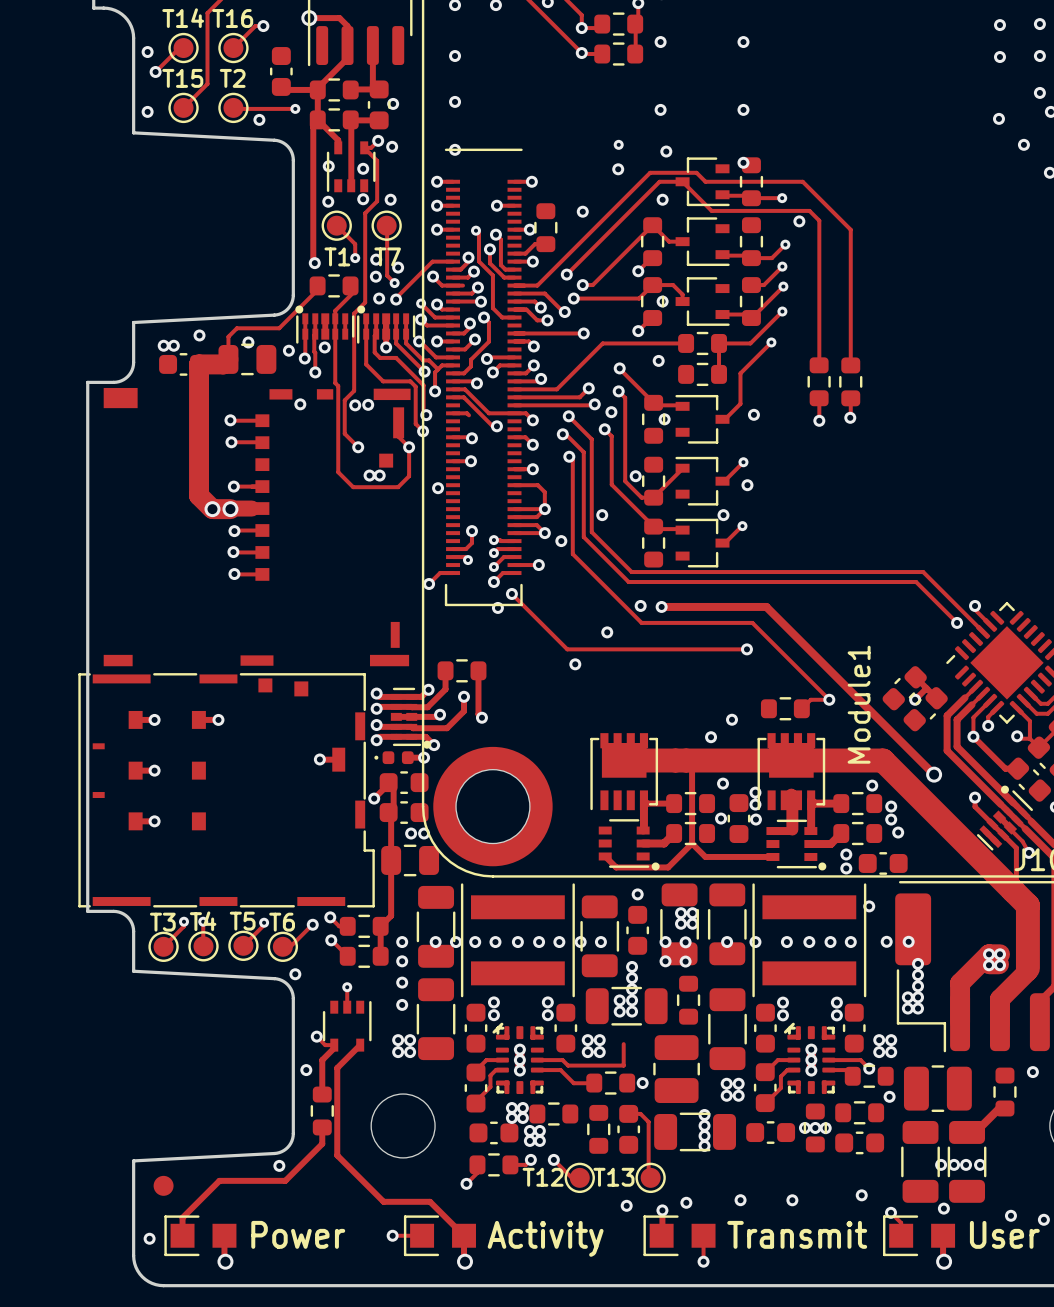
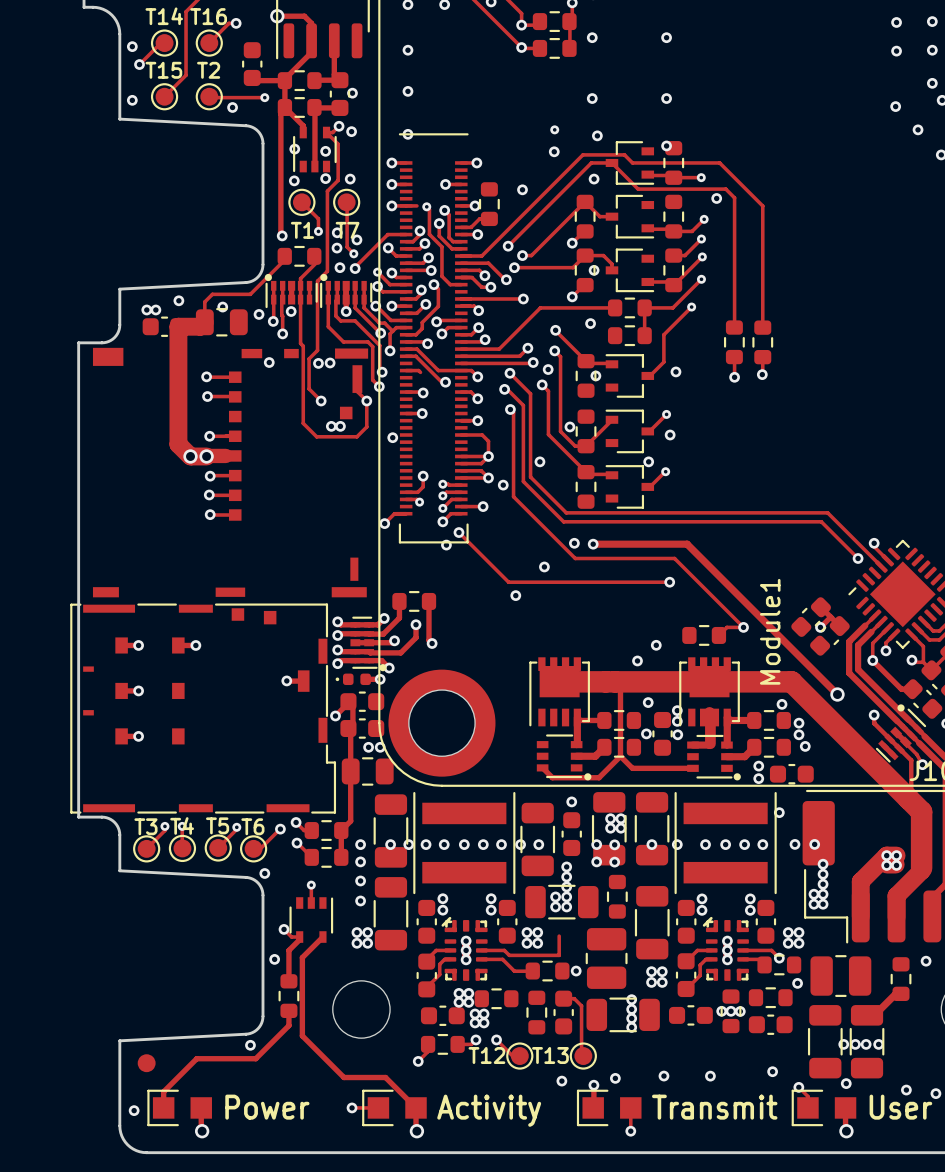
track: none -> (406, 205) (416, 205)
track: (453, 285) (463, 285) -> none

